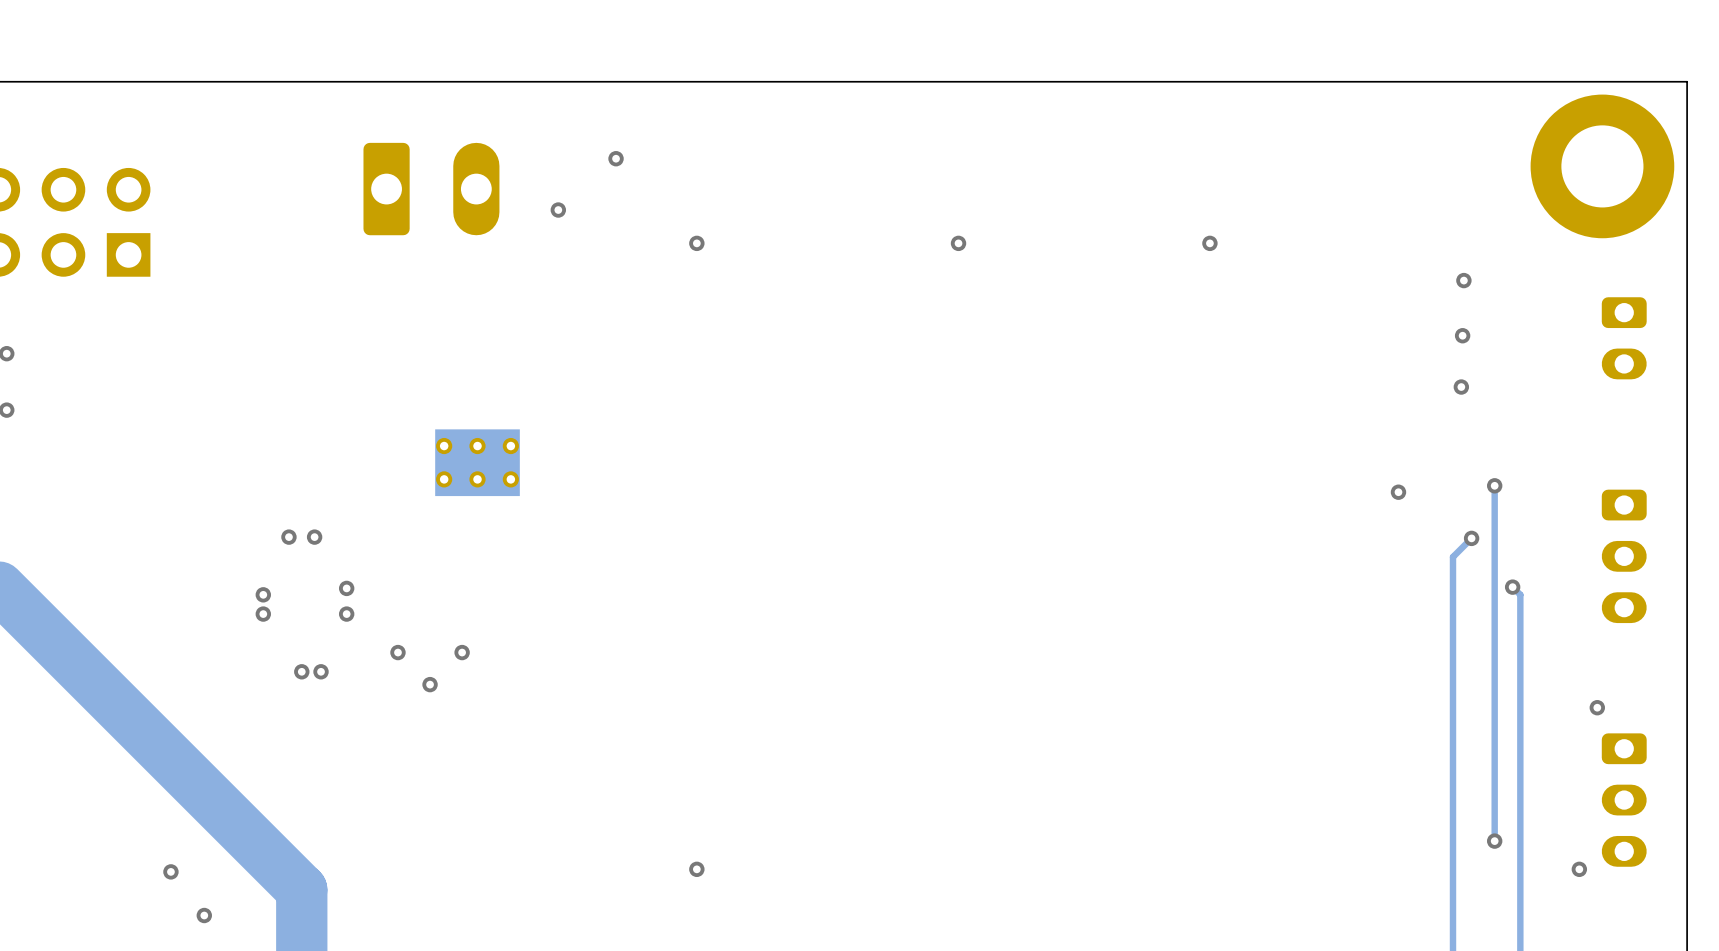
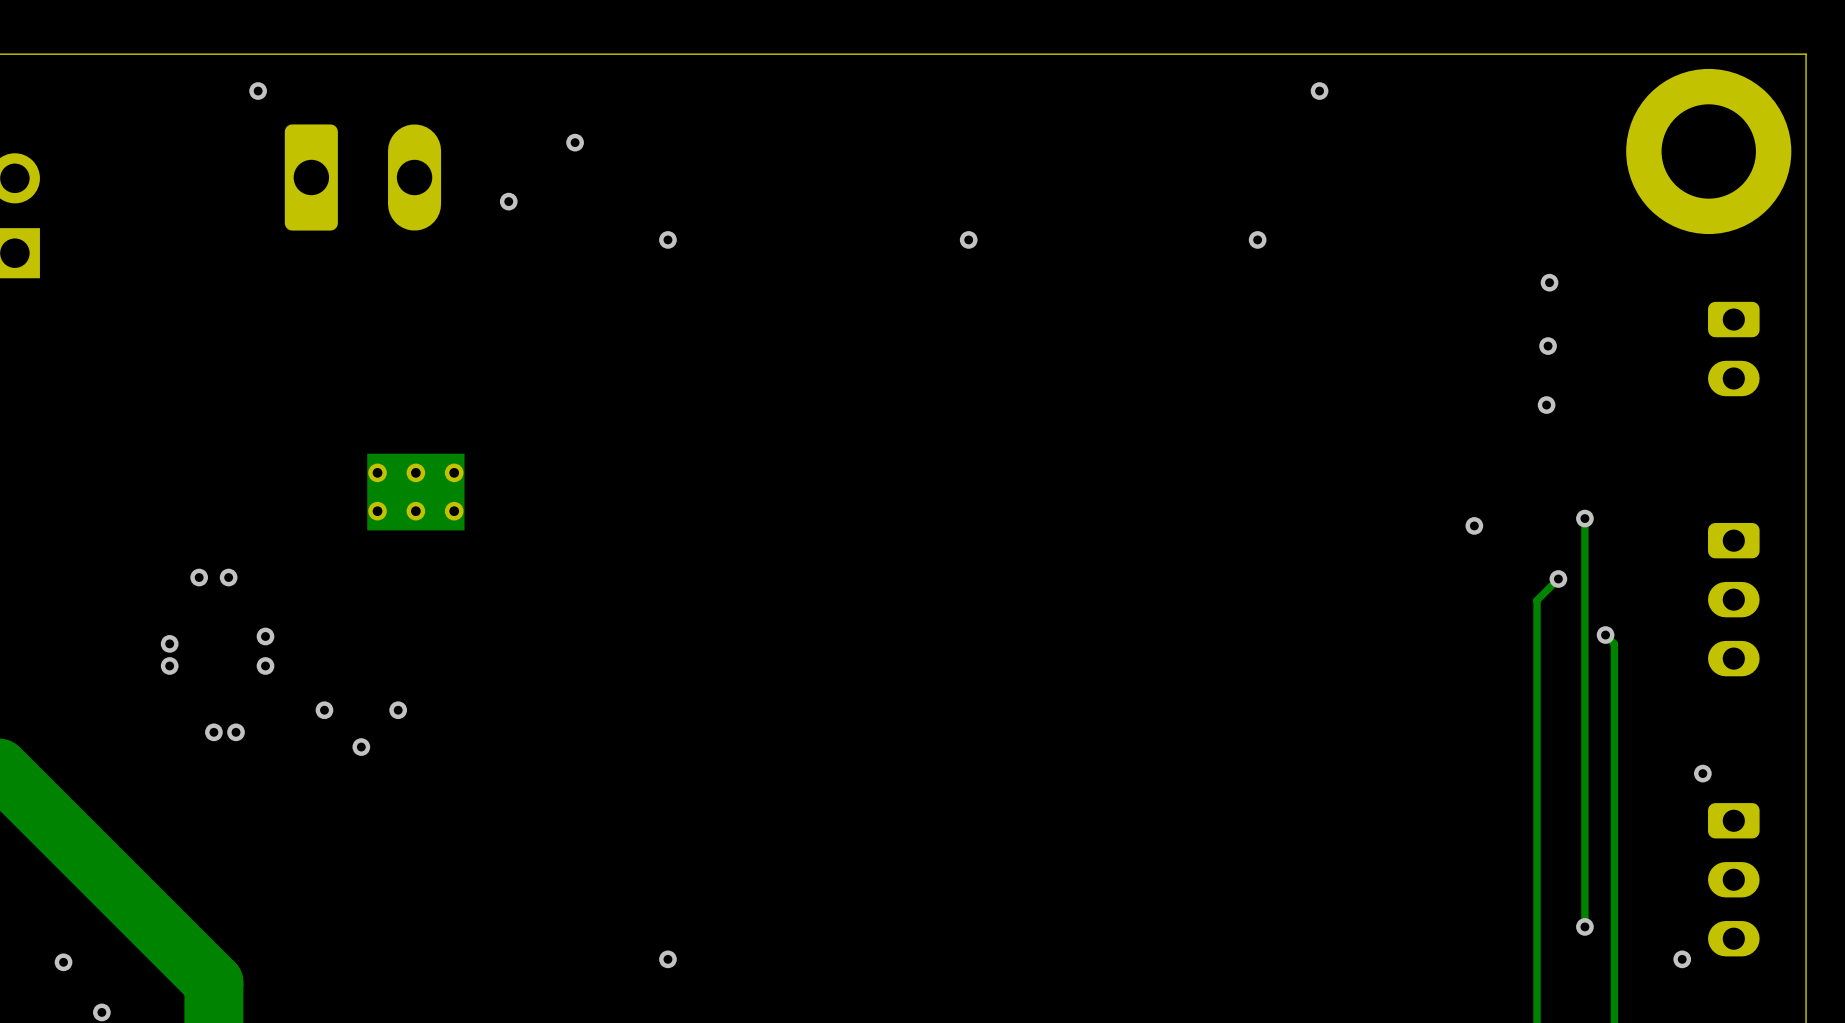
via: none -> (258, 91)
via: none -> (1319, 91)

